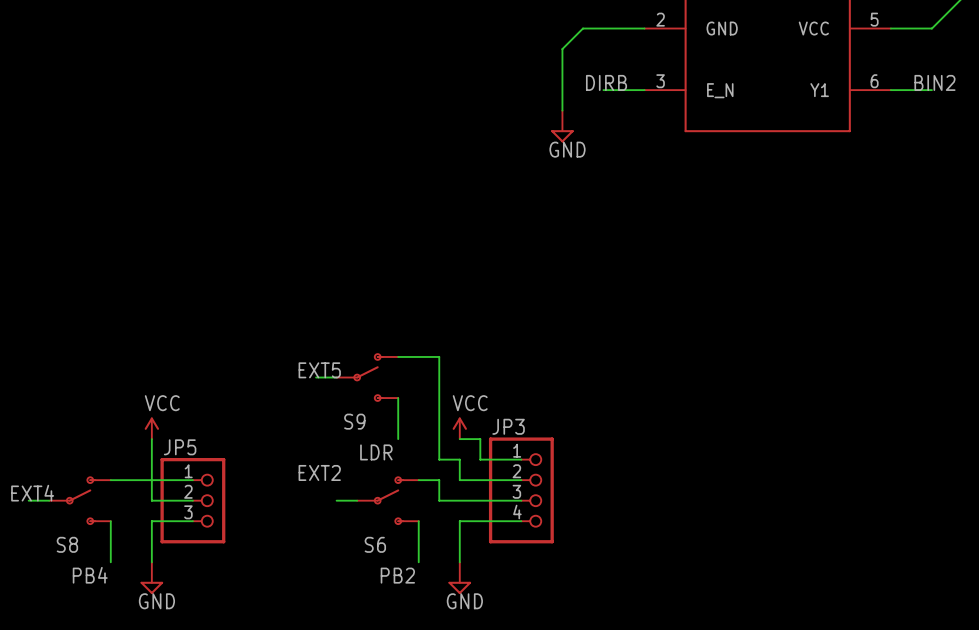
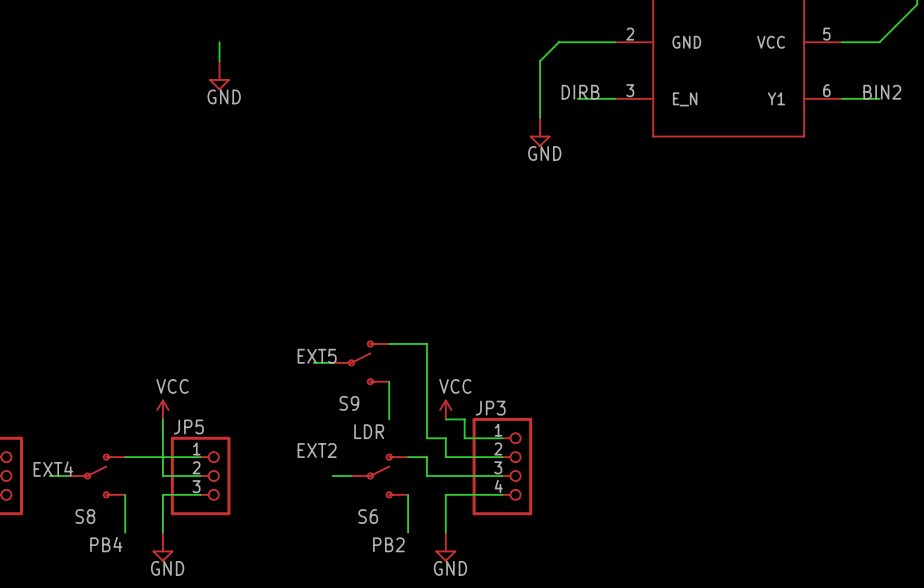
wire: none -> (219, 42) (219, 61)
power symbol: none -> GND (219, 75)

